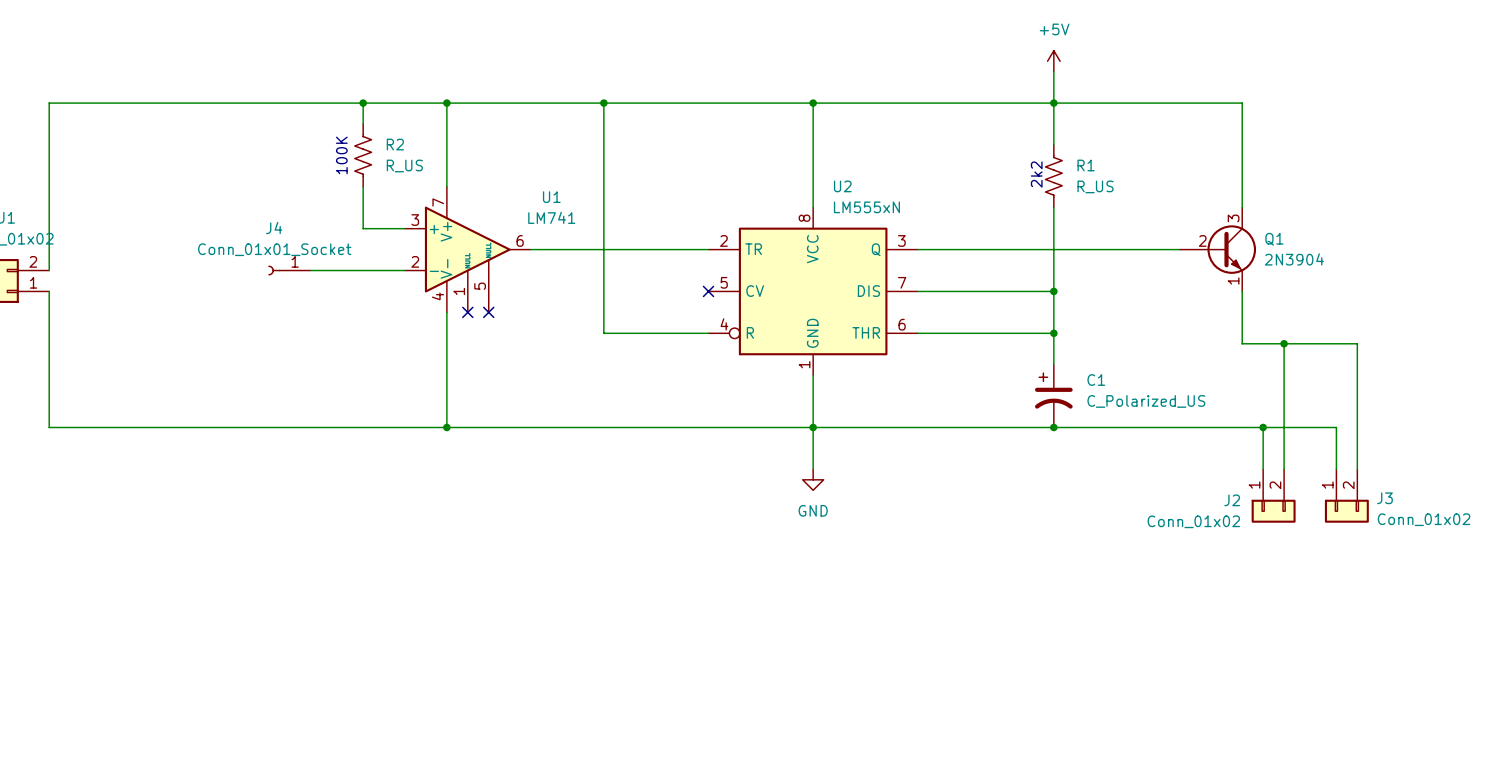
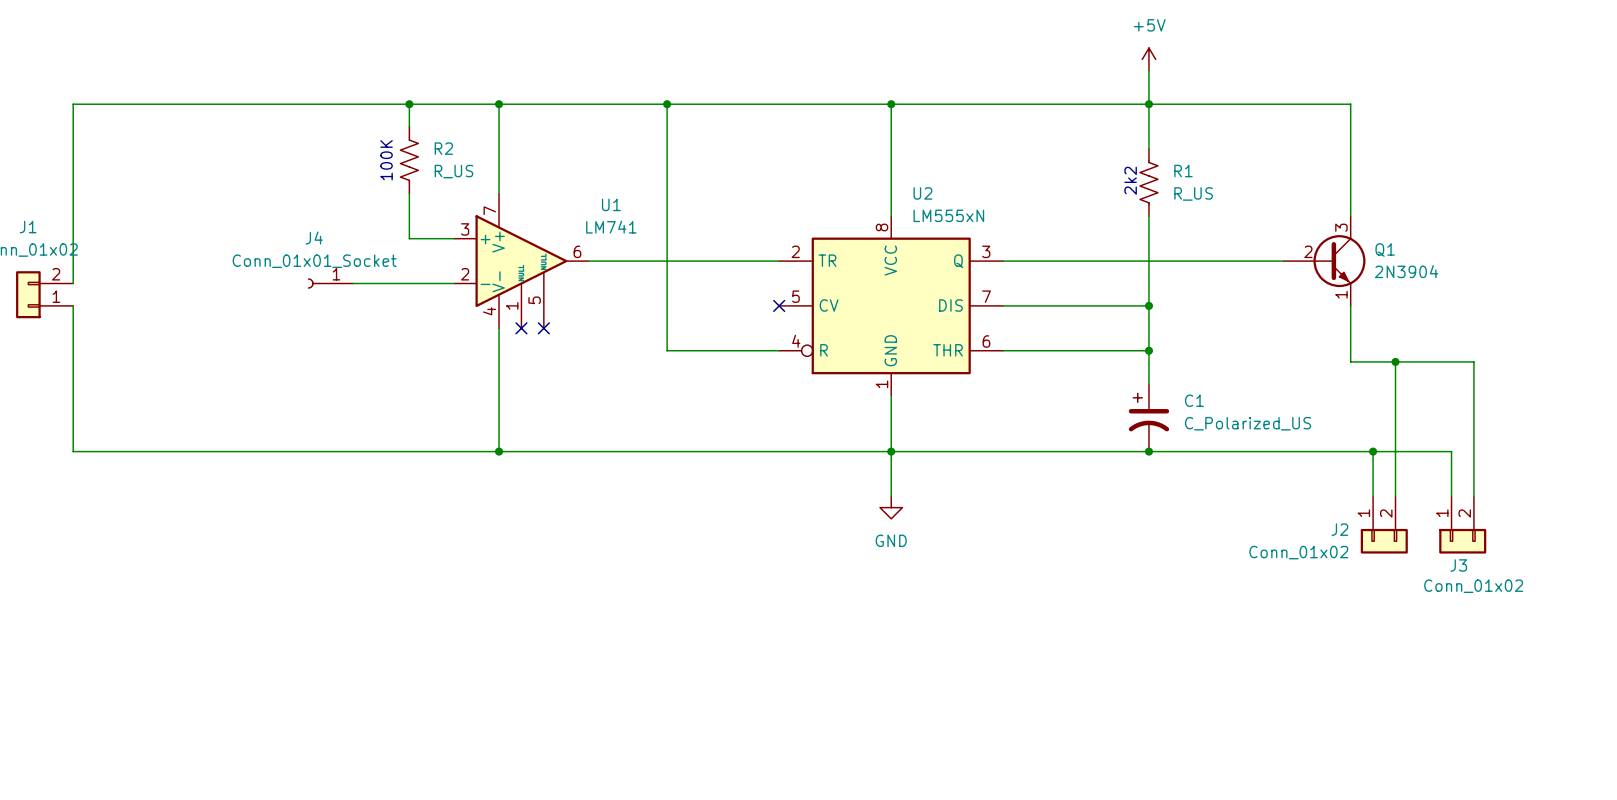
J3 name position: J3 (1384, 498) -> J3 (1458, 565)
J3 value position: Conn_01x02 (1424, 519) -> Conn_01x02 (1473, 586)

